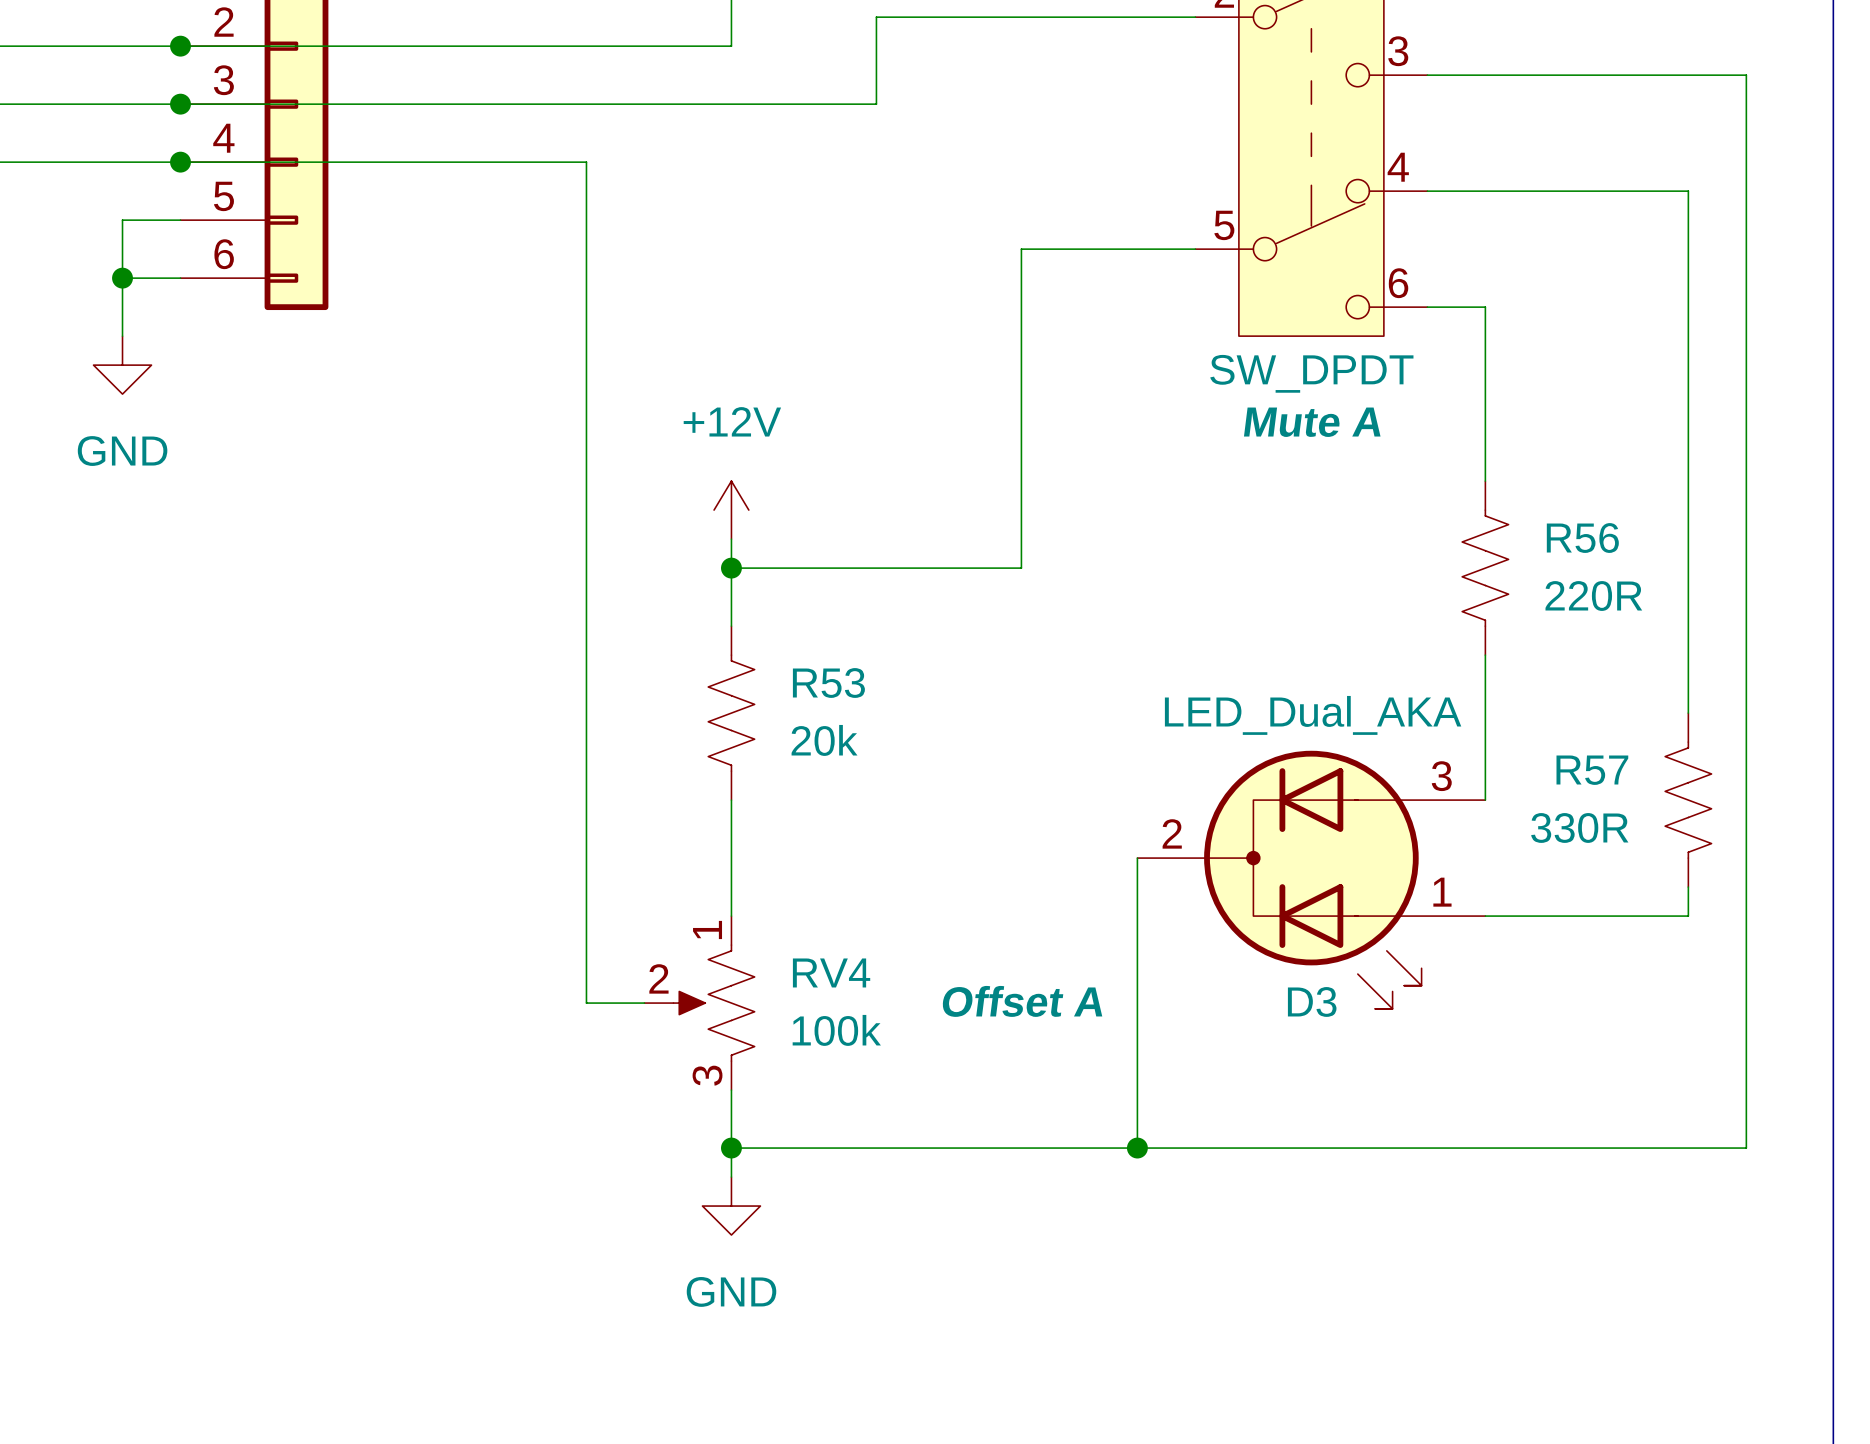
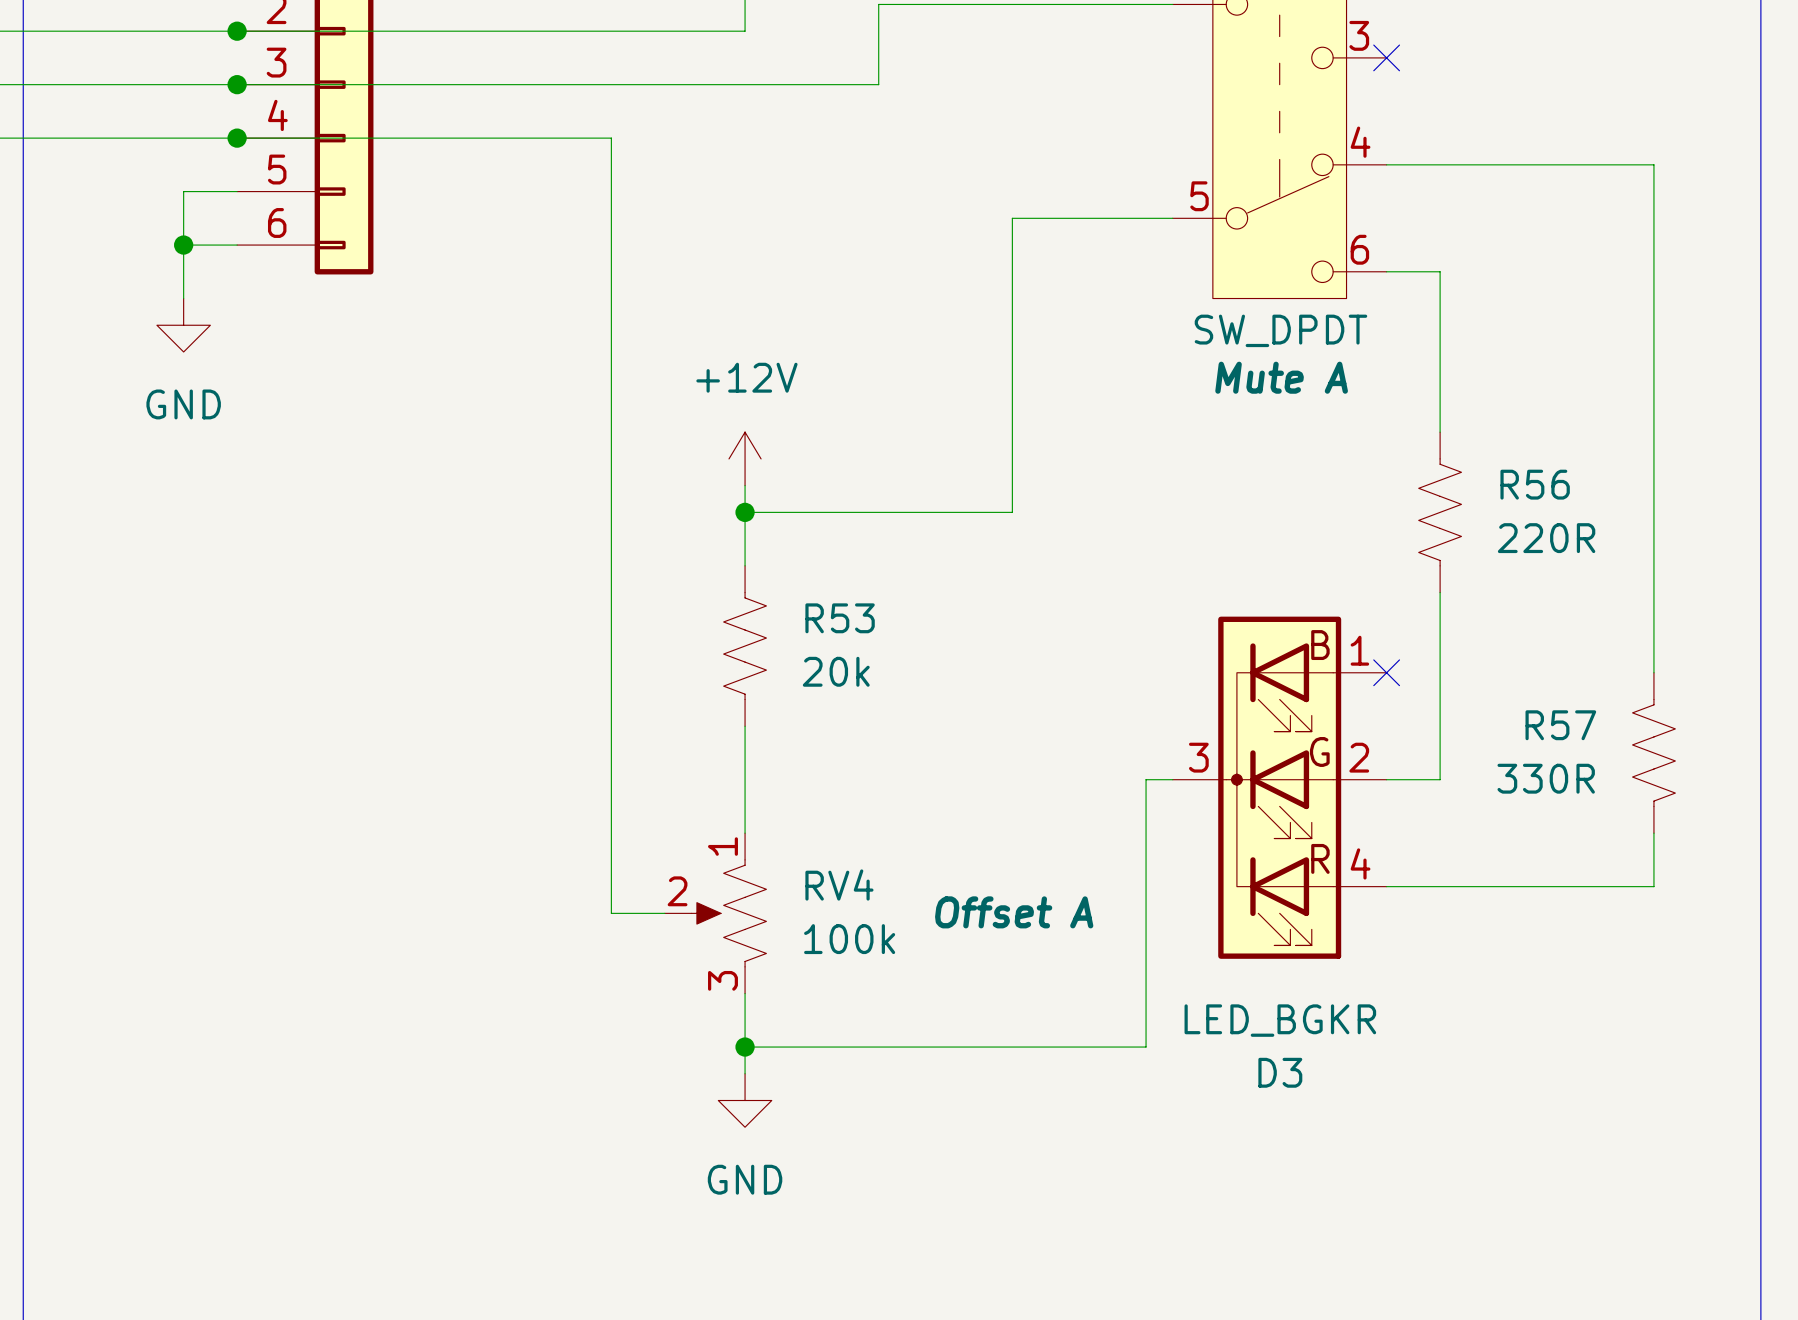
wire: (1427, 75) (1746, 75) (1746, 1148) (1166, 1148) -> (1172, 779) (1146, 779) (1146, 1047)
no-connect mark: none -> (1386, 57)
wire: (1688, 191) (1688, 713) -> (1627, 164) (1653, 164) (1653, 672)
D3 value: LED_Dual_AKA (1313, 715) -> LED_BGKR (1280, 1020)
no-connect mark: none -> (1386, 672)
D3 symbol: [1137, 750, 1486, 1009] -> [1172, 616, 1387, 959]
wire: none -> (1440, 726) (1440, 779) (1386, 779)
R57 position: (1688, 800) -> (1653, 752)
wire: (1137, 858) (1137, 1148) -> none
wire: (1688, 887) (1688, 916) (1485, 916) -> none
wire: none -> (1653, 833) (1653, 886) (1386, 886)
D3 name position: D3 (1312, 1001) -> D3 (1280, 1072)
junction: (1137, 1148) -> none

